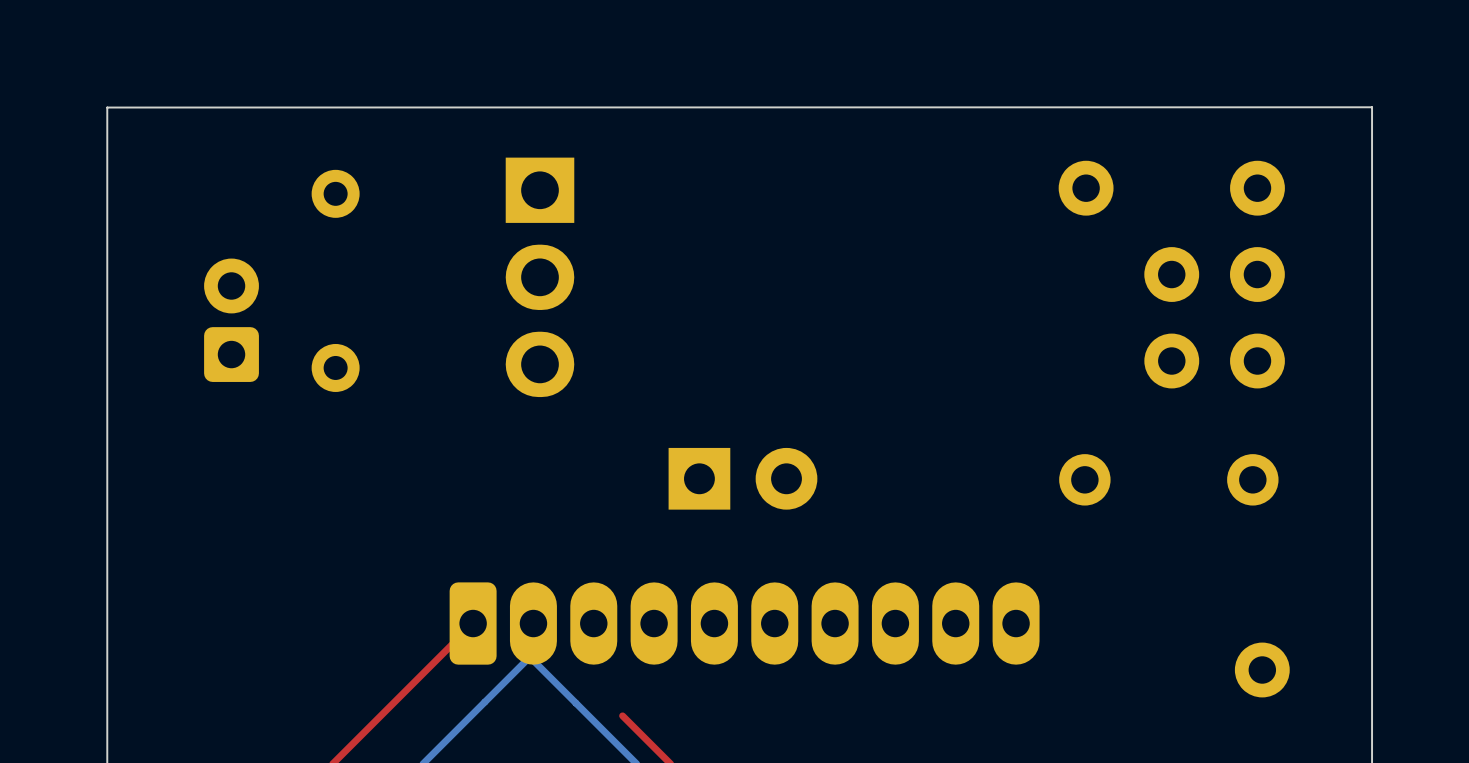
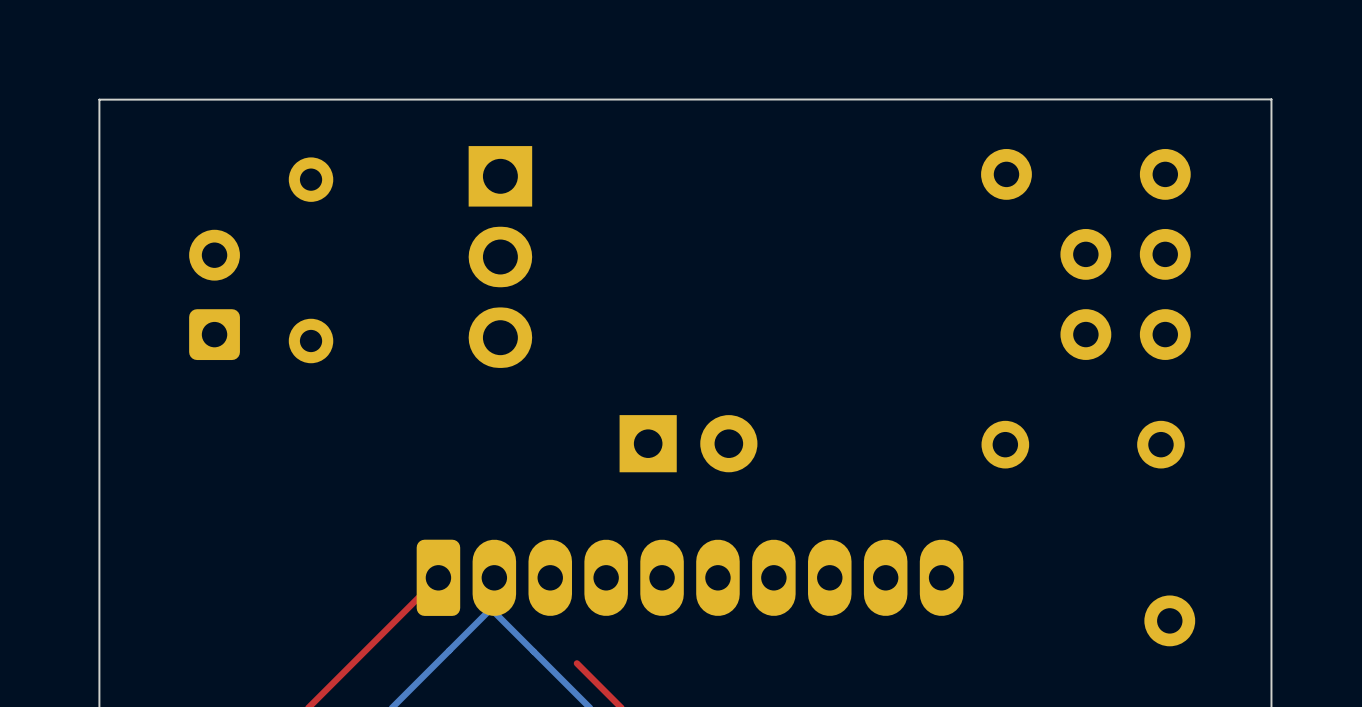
part footprint: [204, 258, 259, 382] -> [189, 229, 240, 361]

